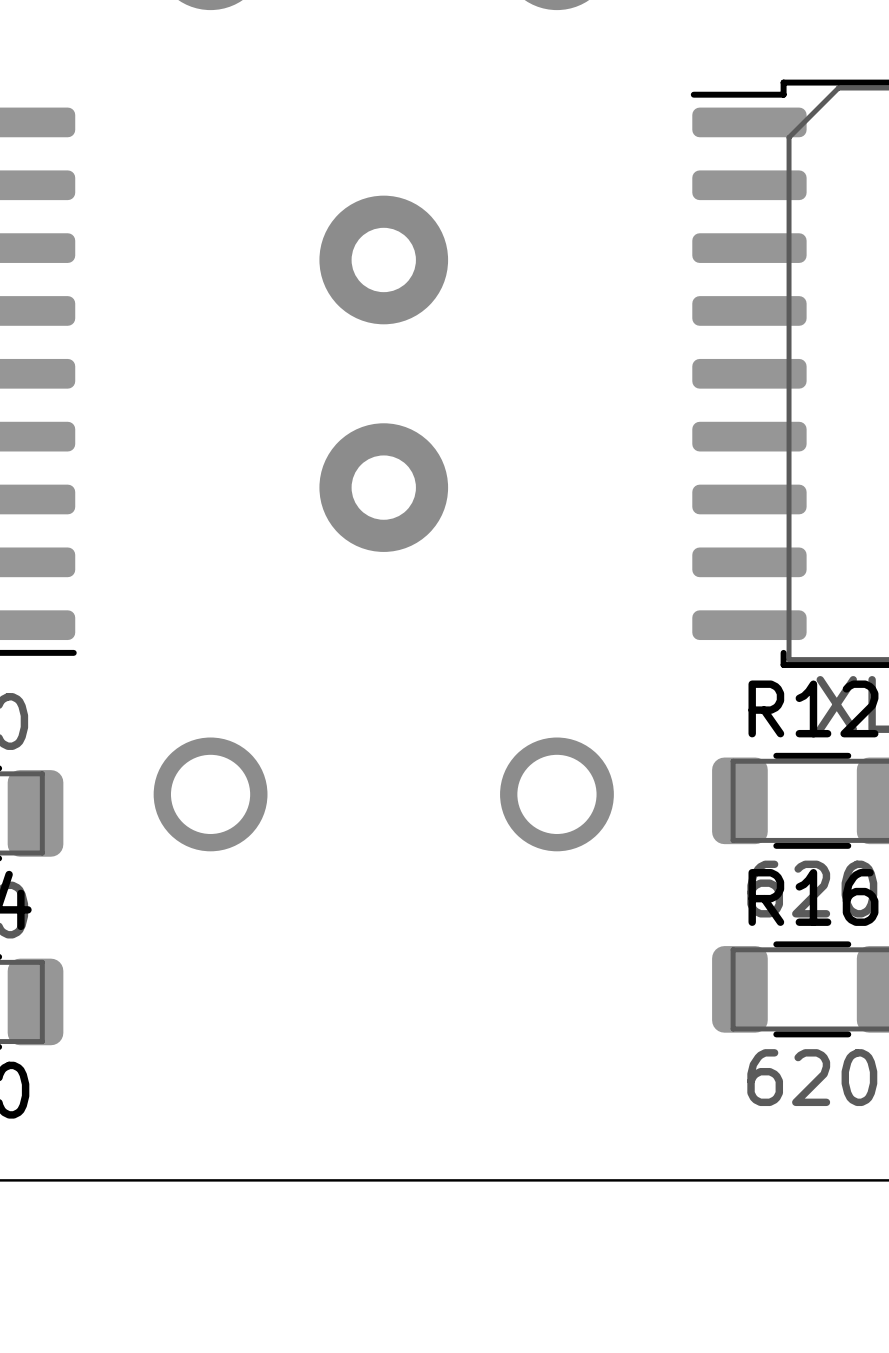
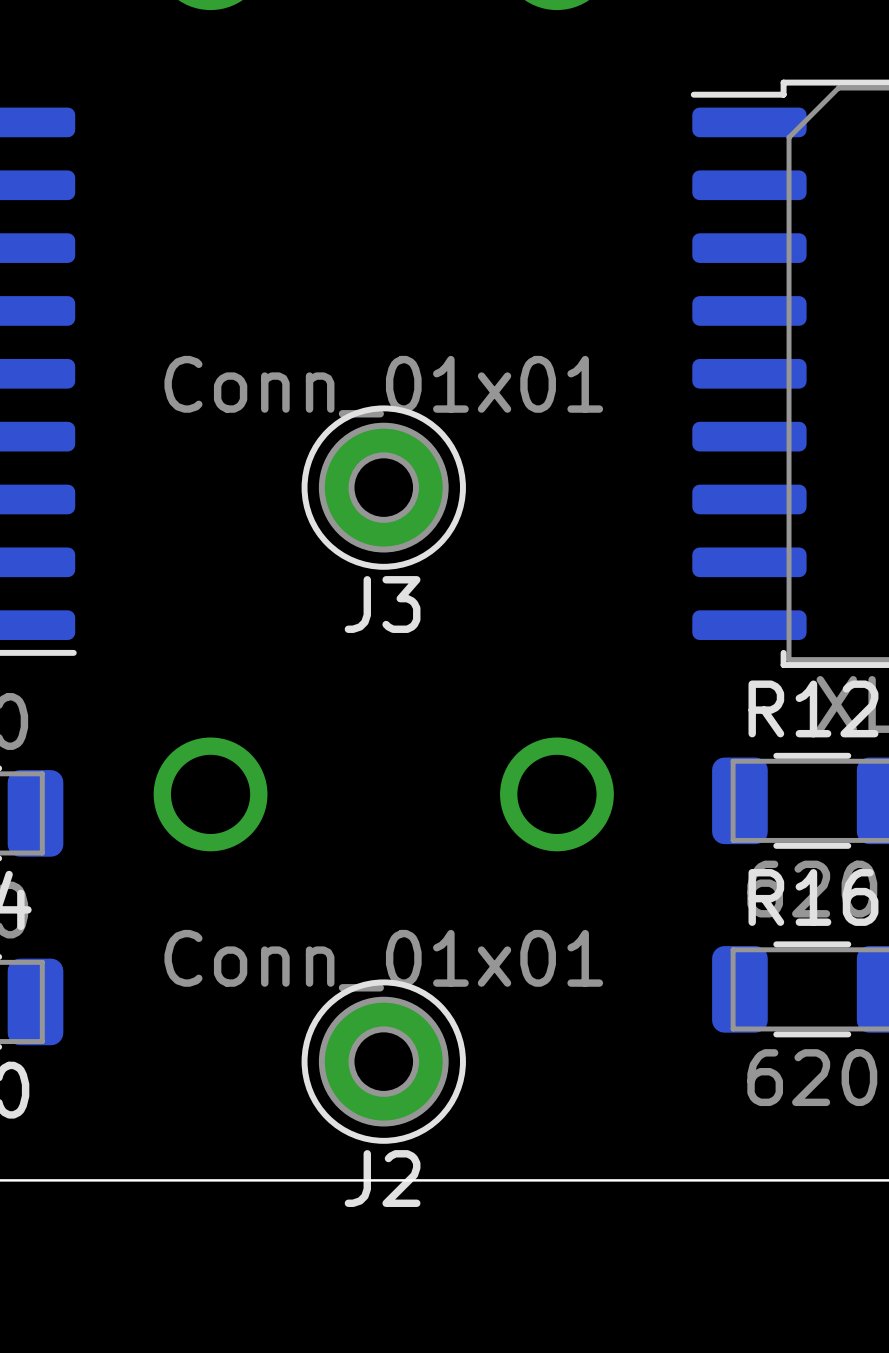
J3 side: top (383, 259) -> bottom (383, 487)
J2 side: top (383, 487) -> bottom (383, 1061)

